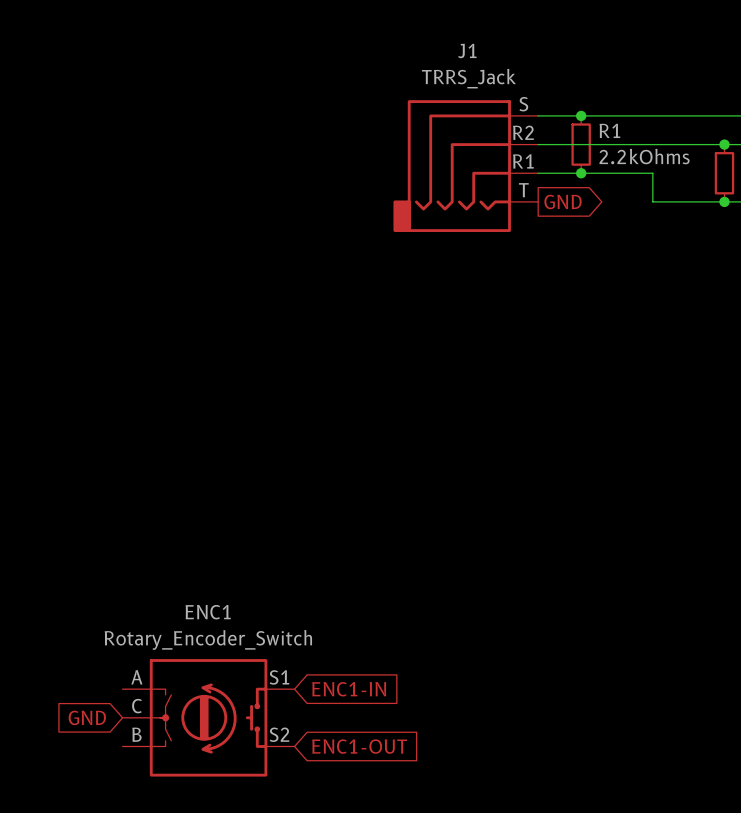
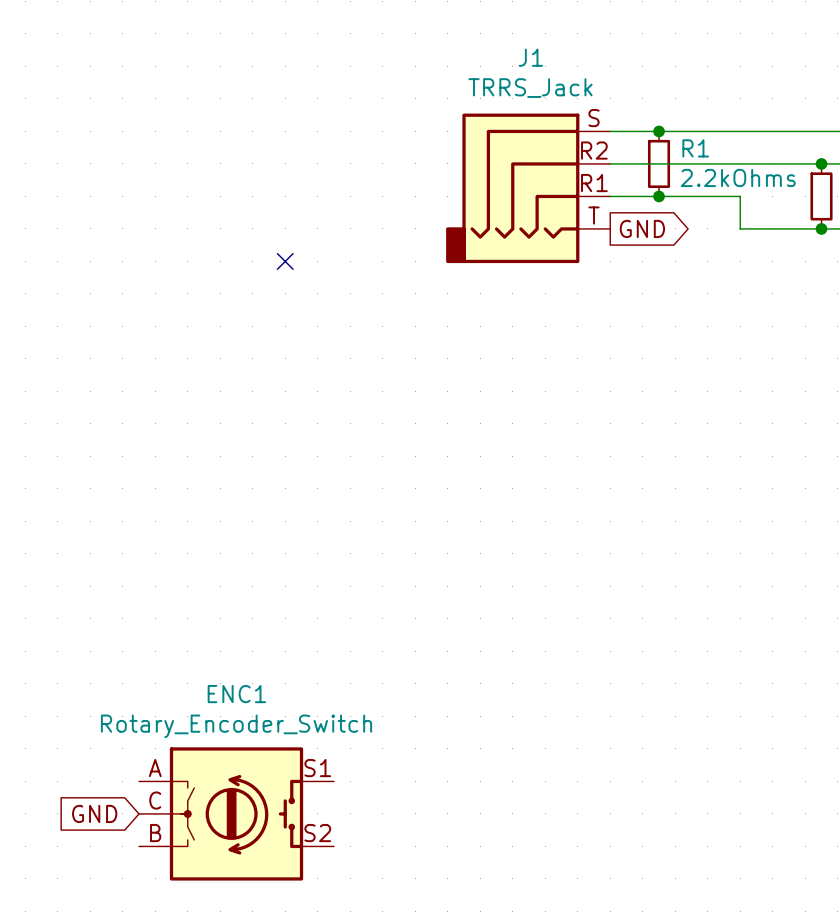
no-connect mark: none -> (285, 261)
global label: ENC1-IN (349, 689) -> none
global label: ENC1-OUT (359, 746) -> none

